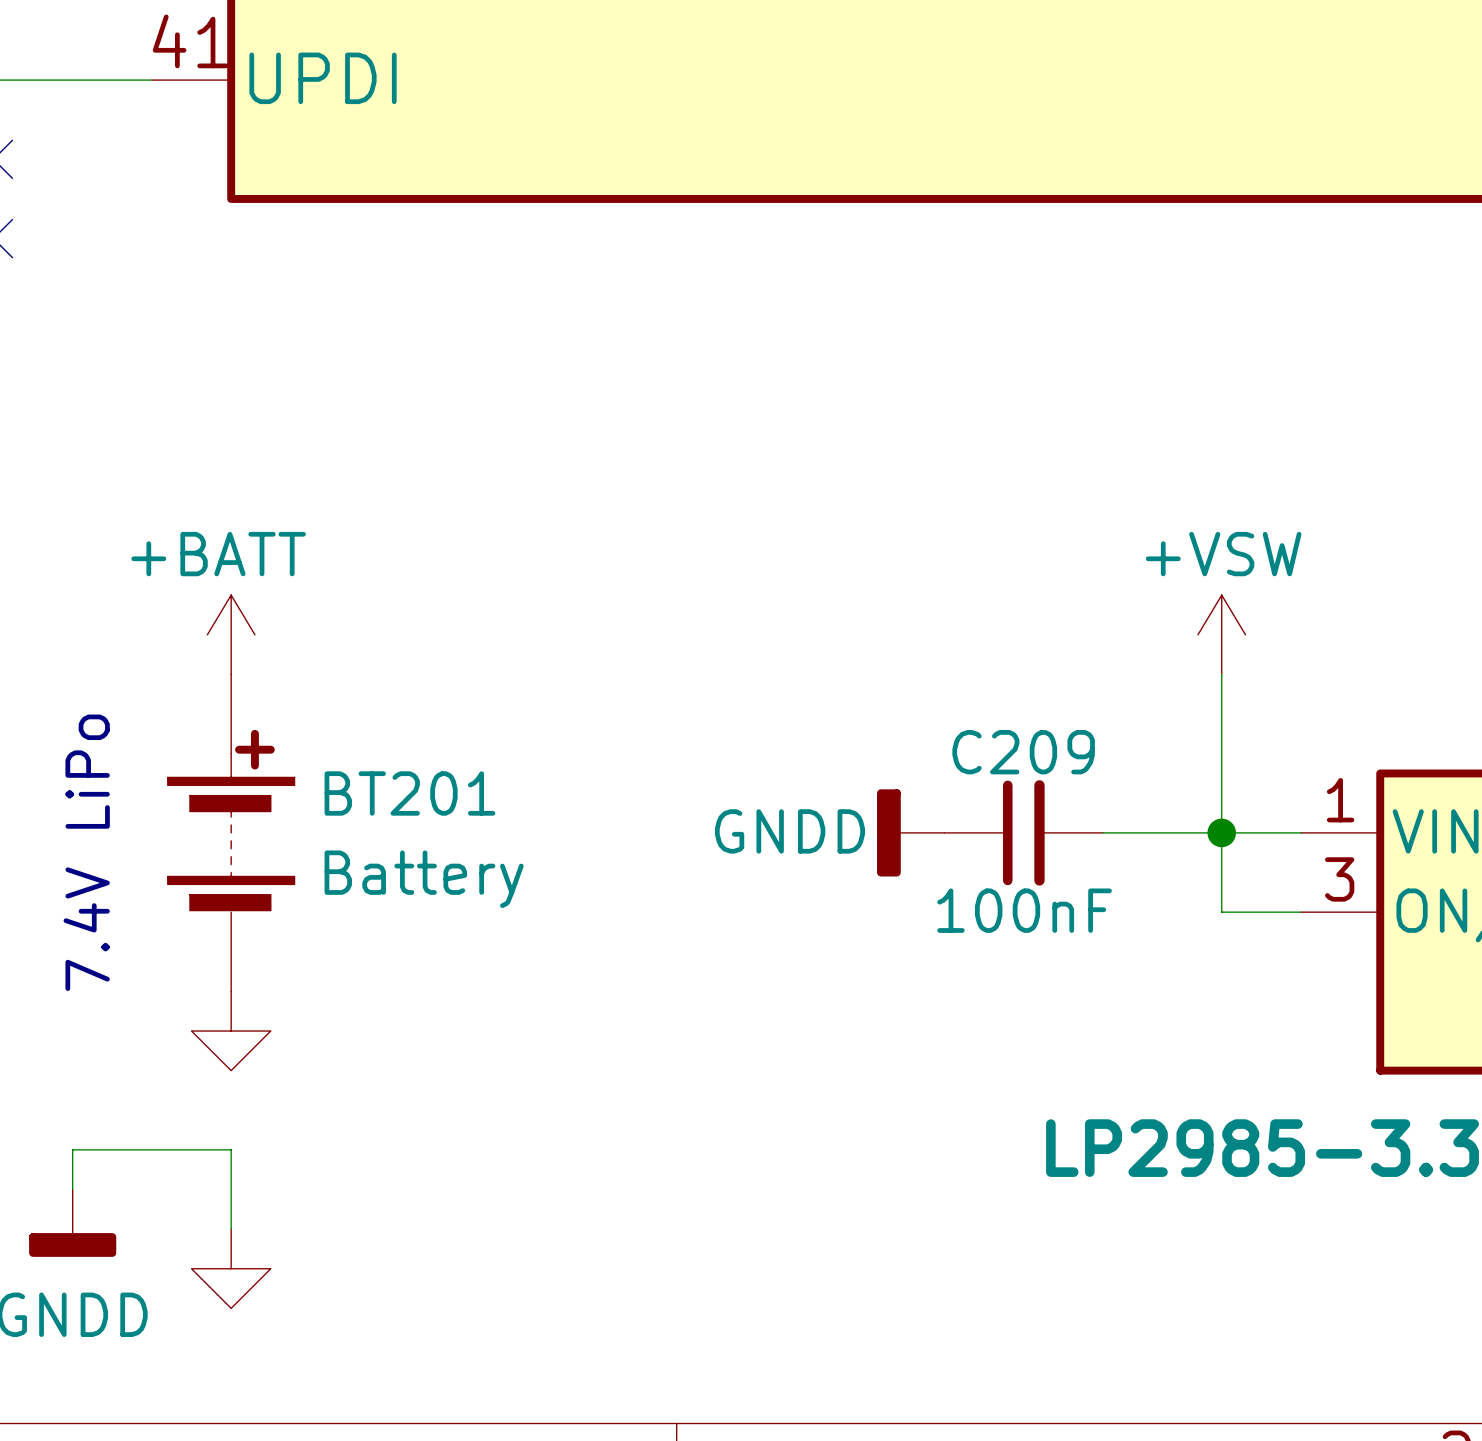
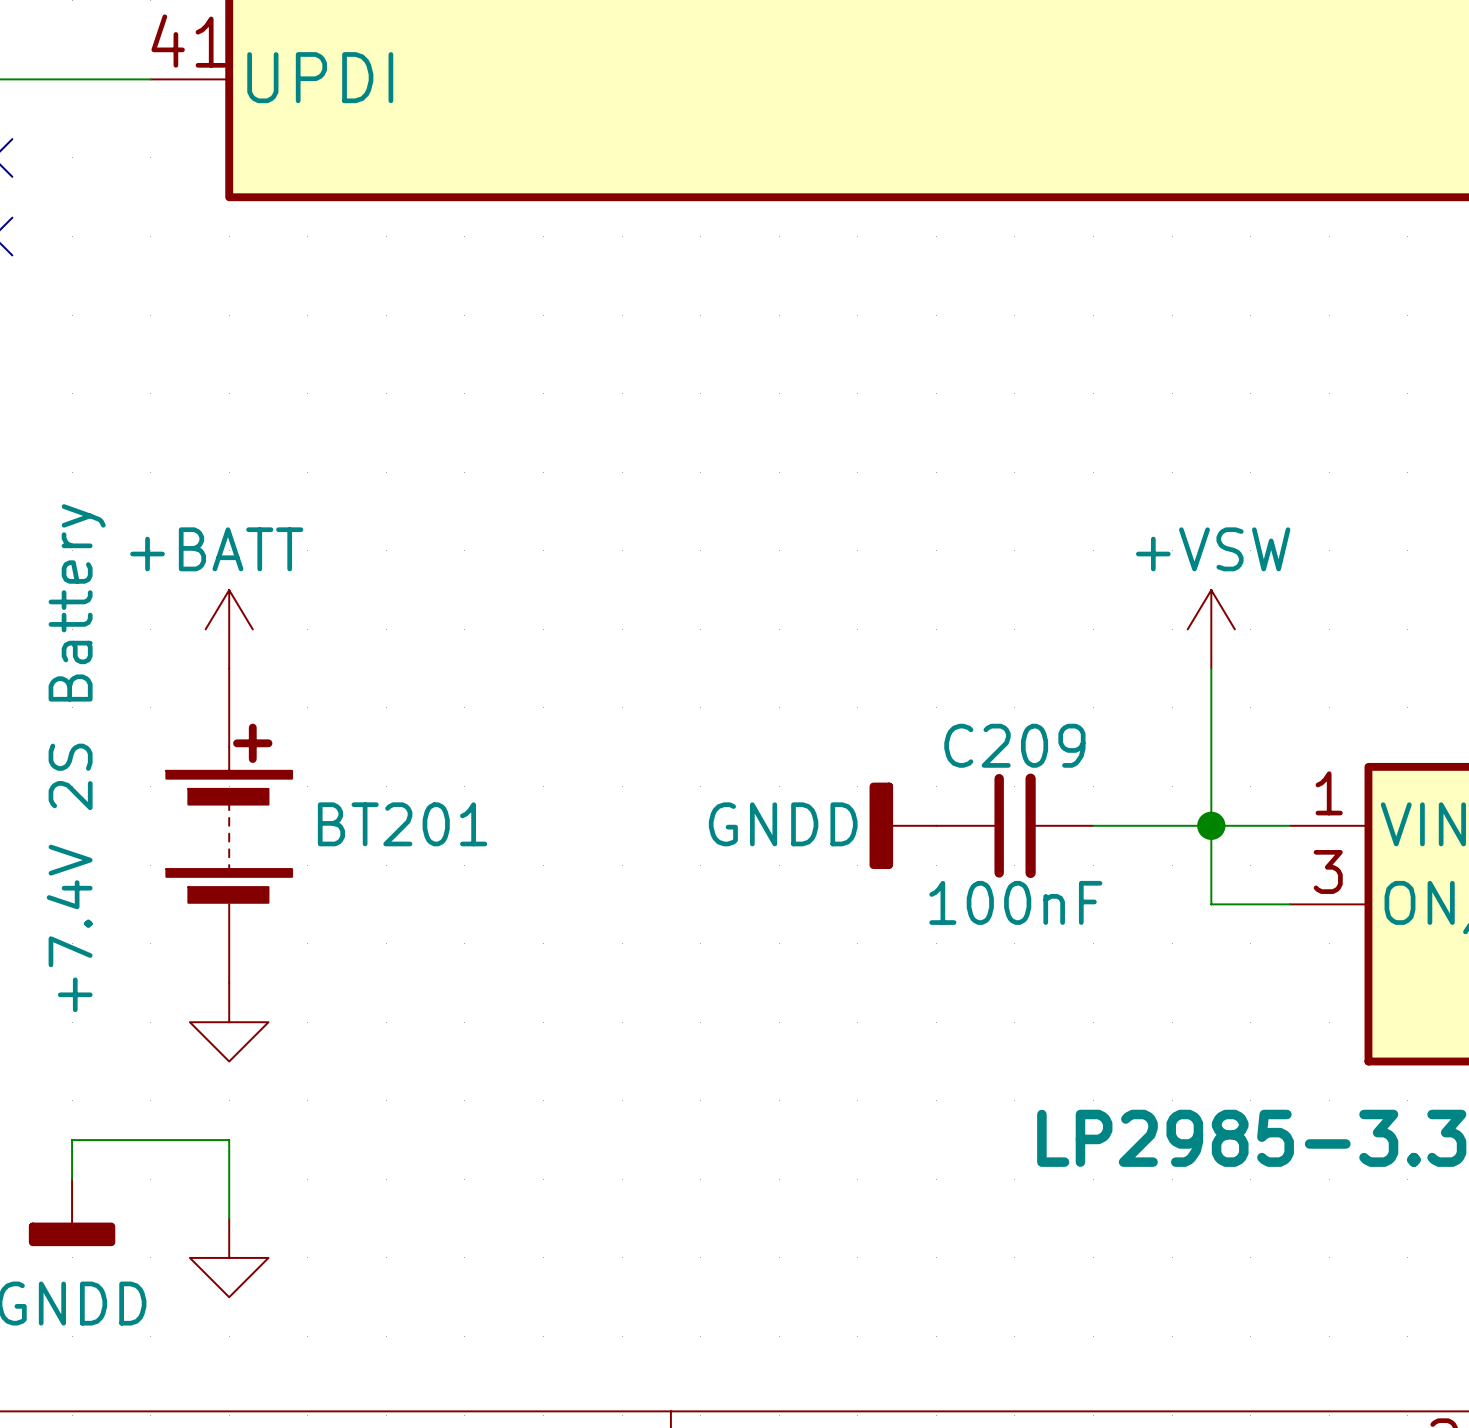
BT201 name position: BT201 (409, 793) -> BT201 (402, 824)
text: 7.4V LiPo (86, 852) -> none
BT201 value: Battery (424, 879) -> +7.4V 2S Battery (76, 758)

